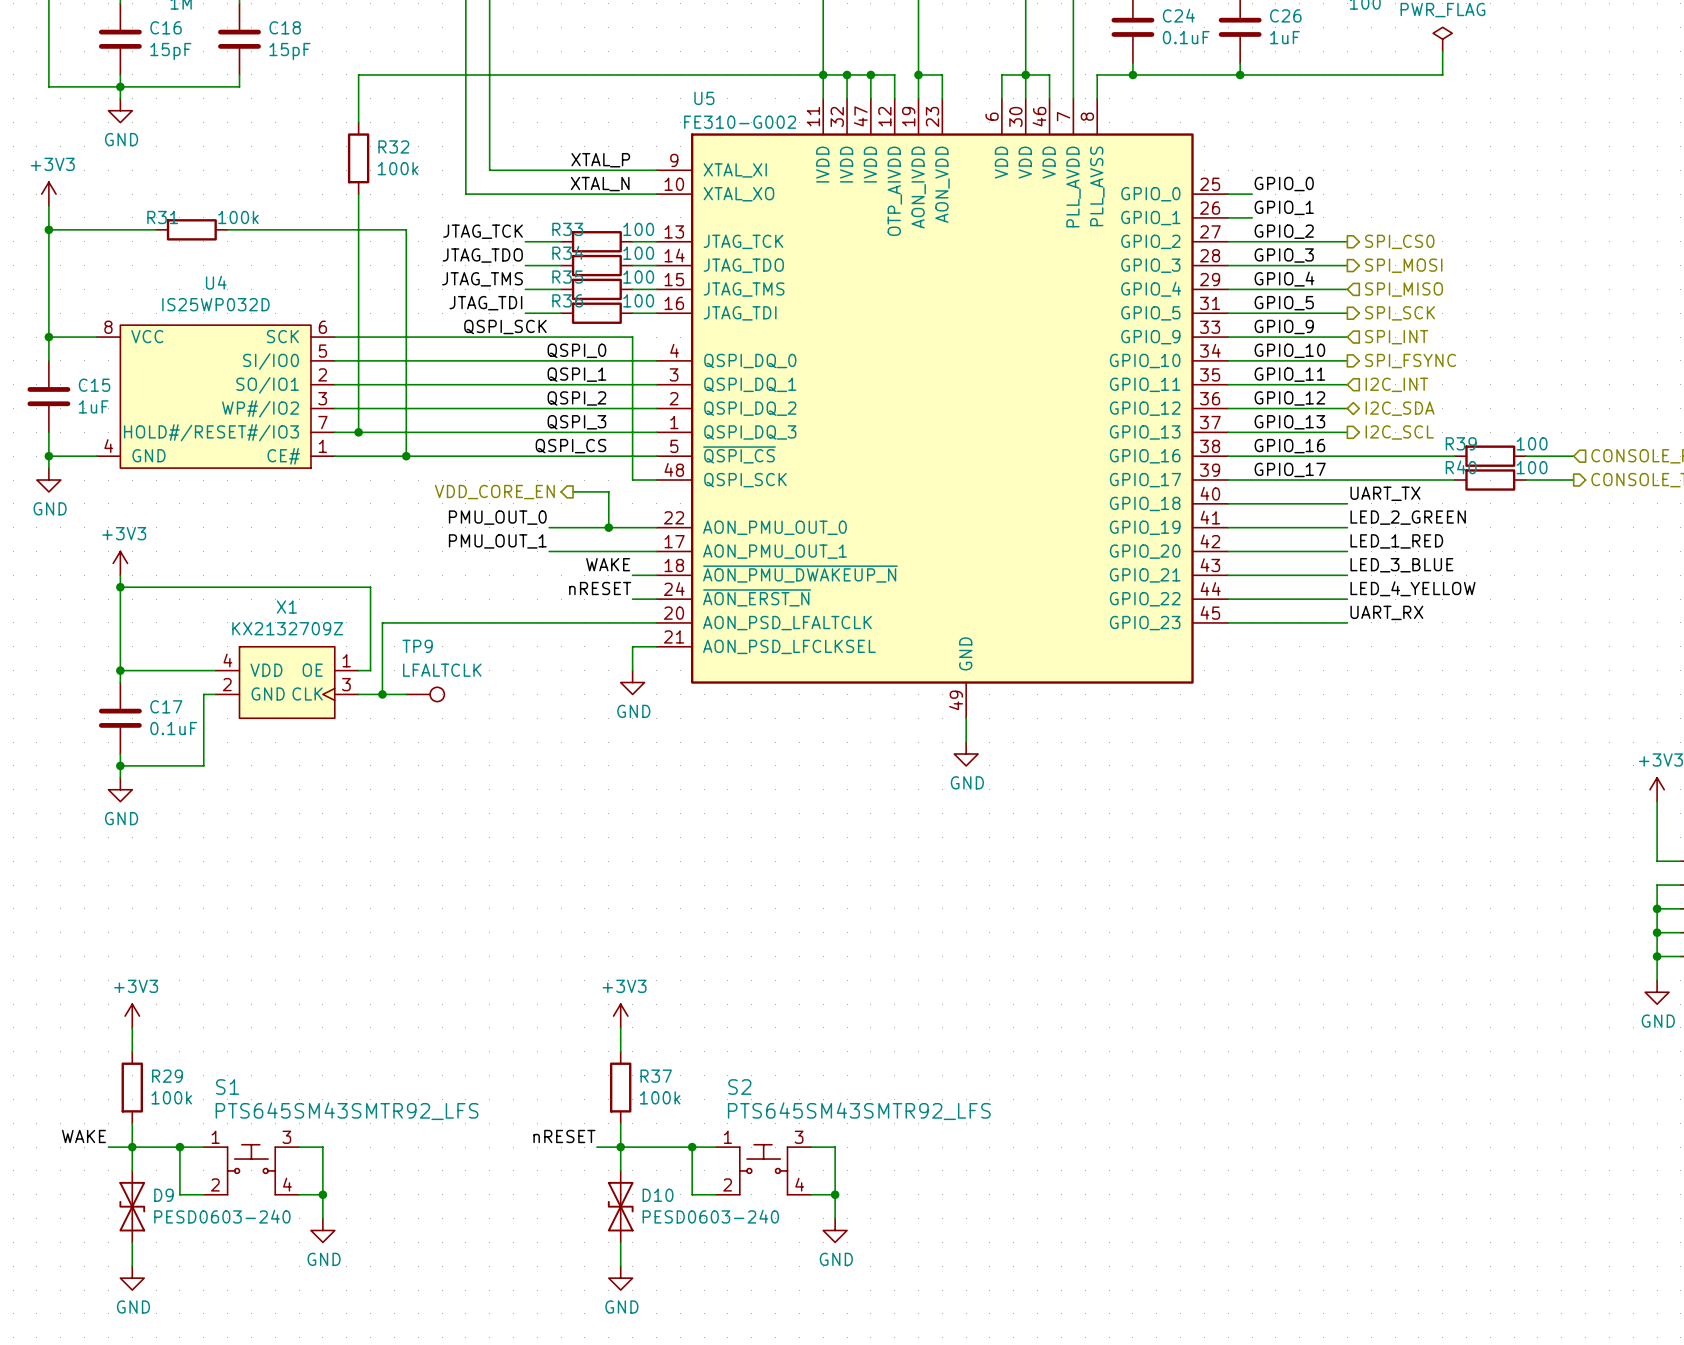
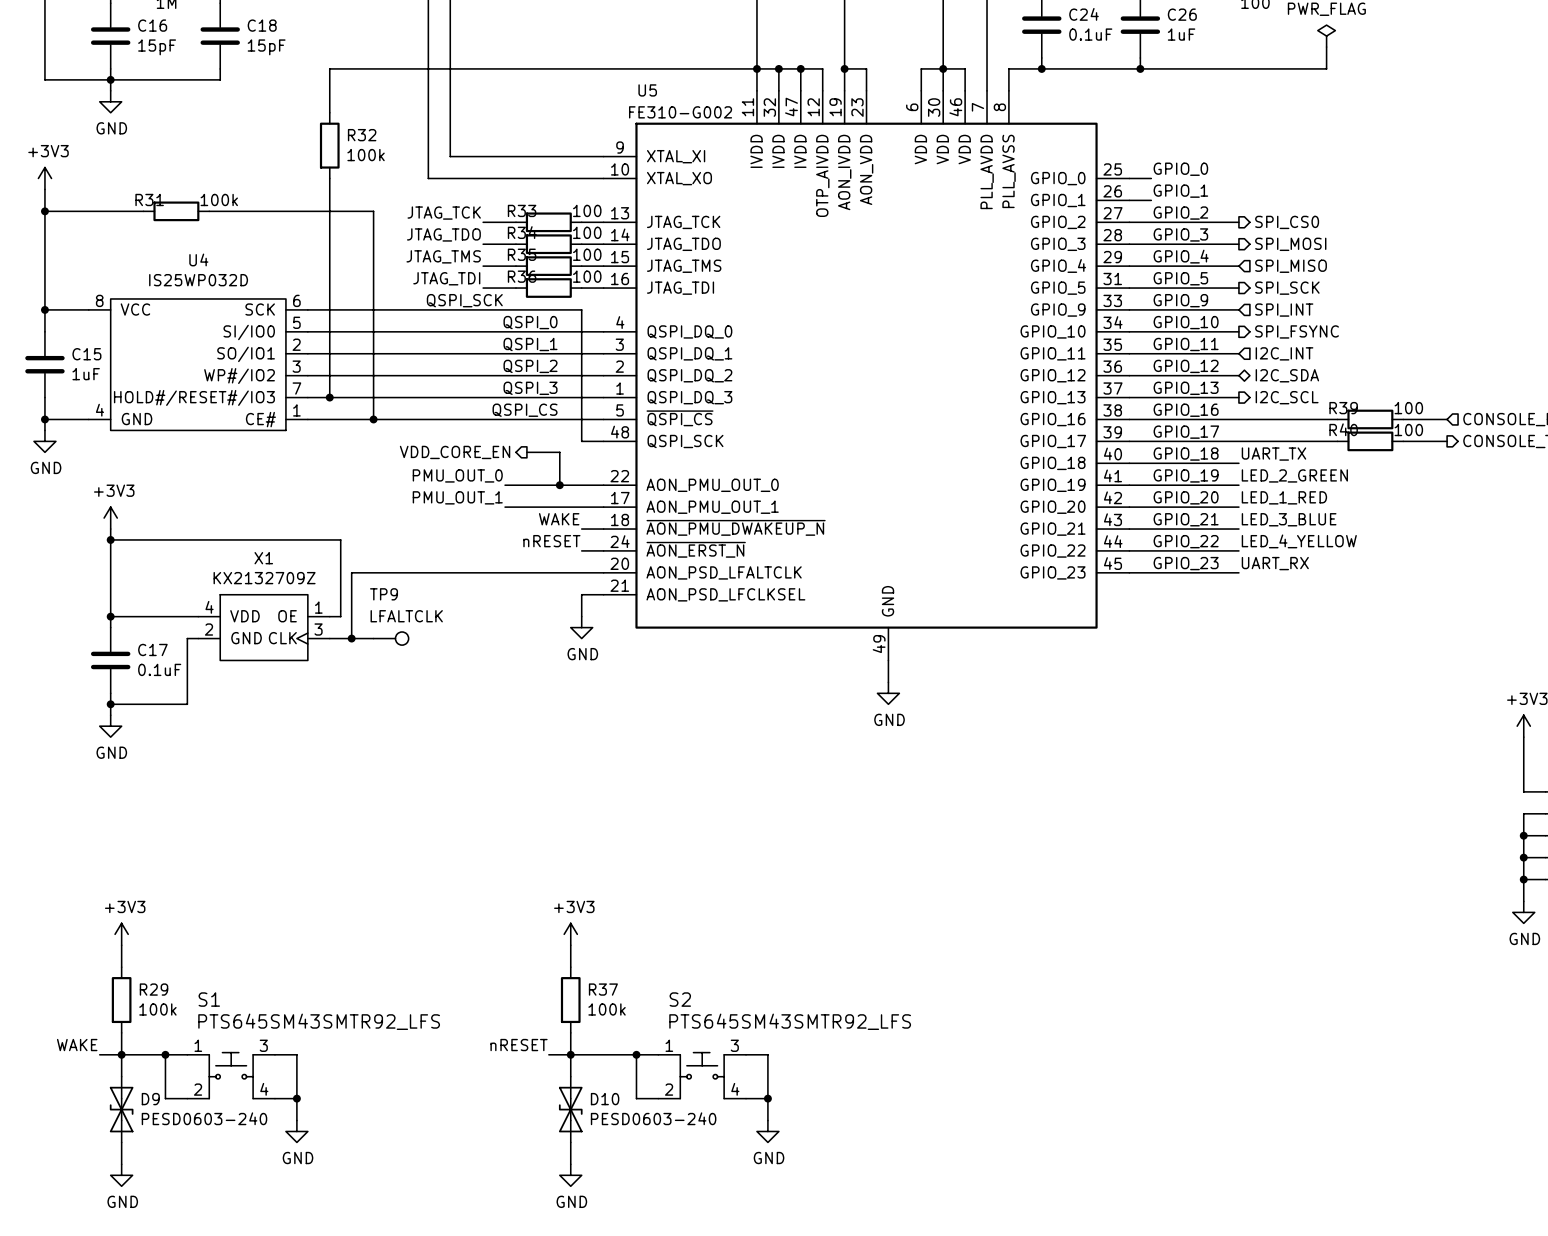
label: XTAL_P (600, 160) -> none
label: XTAL_N (600, 184) -> none
label: none -> GPIO_18 (1186, 454)
label: none -> GPIO_19 (1186, 475)
label: none -> GPIO_20 (1186, 497)
label: none -> GPIO_21 (1186, 519)
label: none -> GPIO_22 (1186, 541)
label: none -> GPIO_23 (1186, 563)

